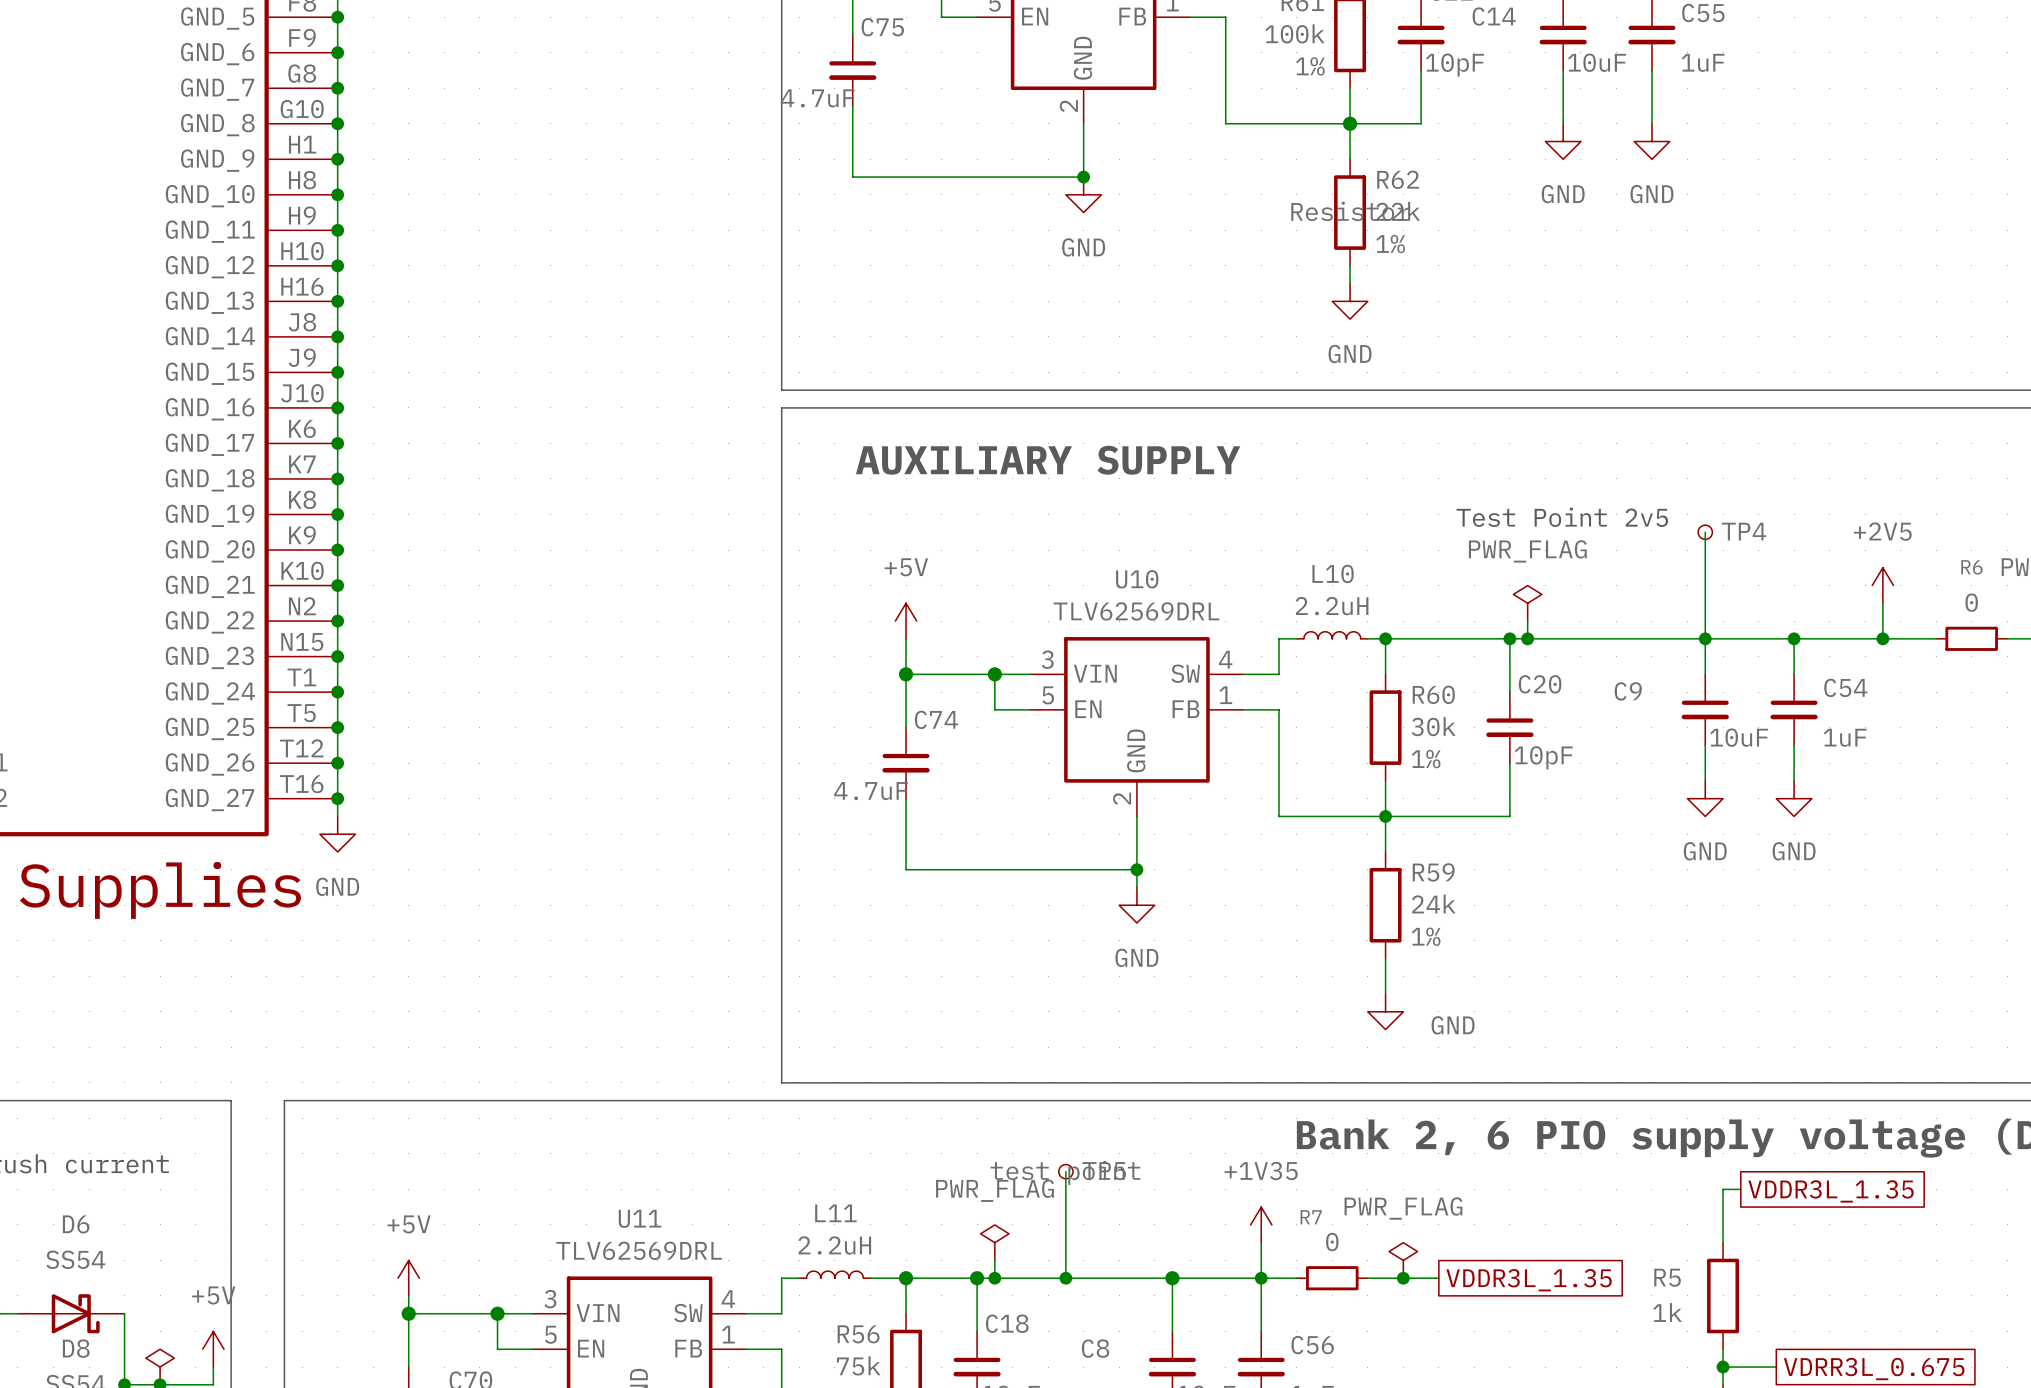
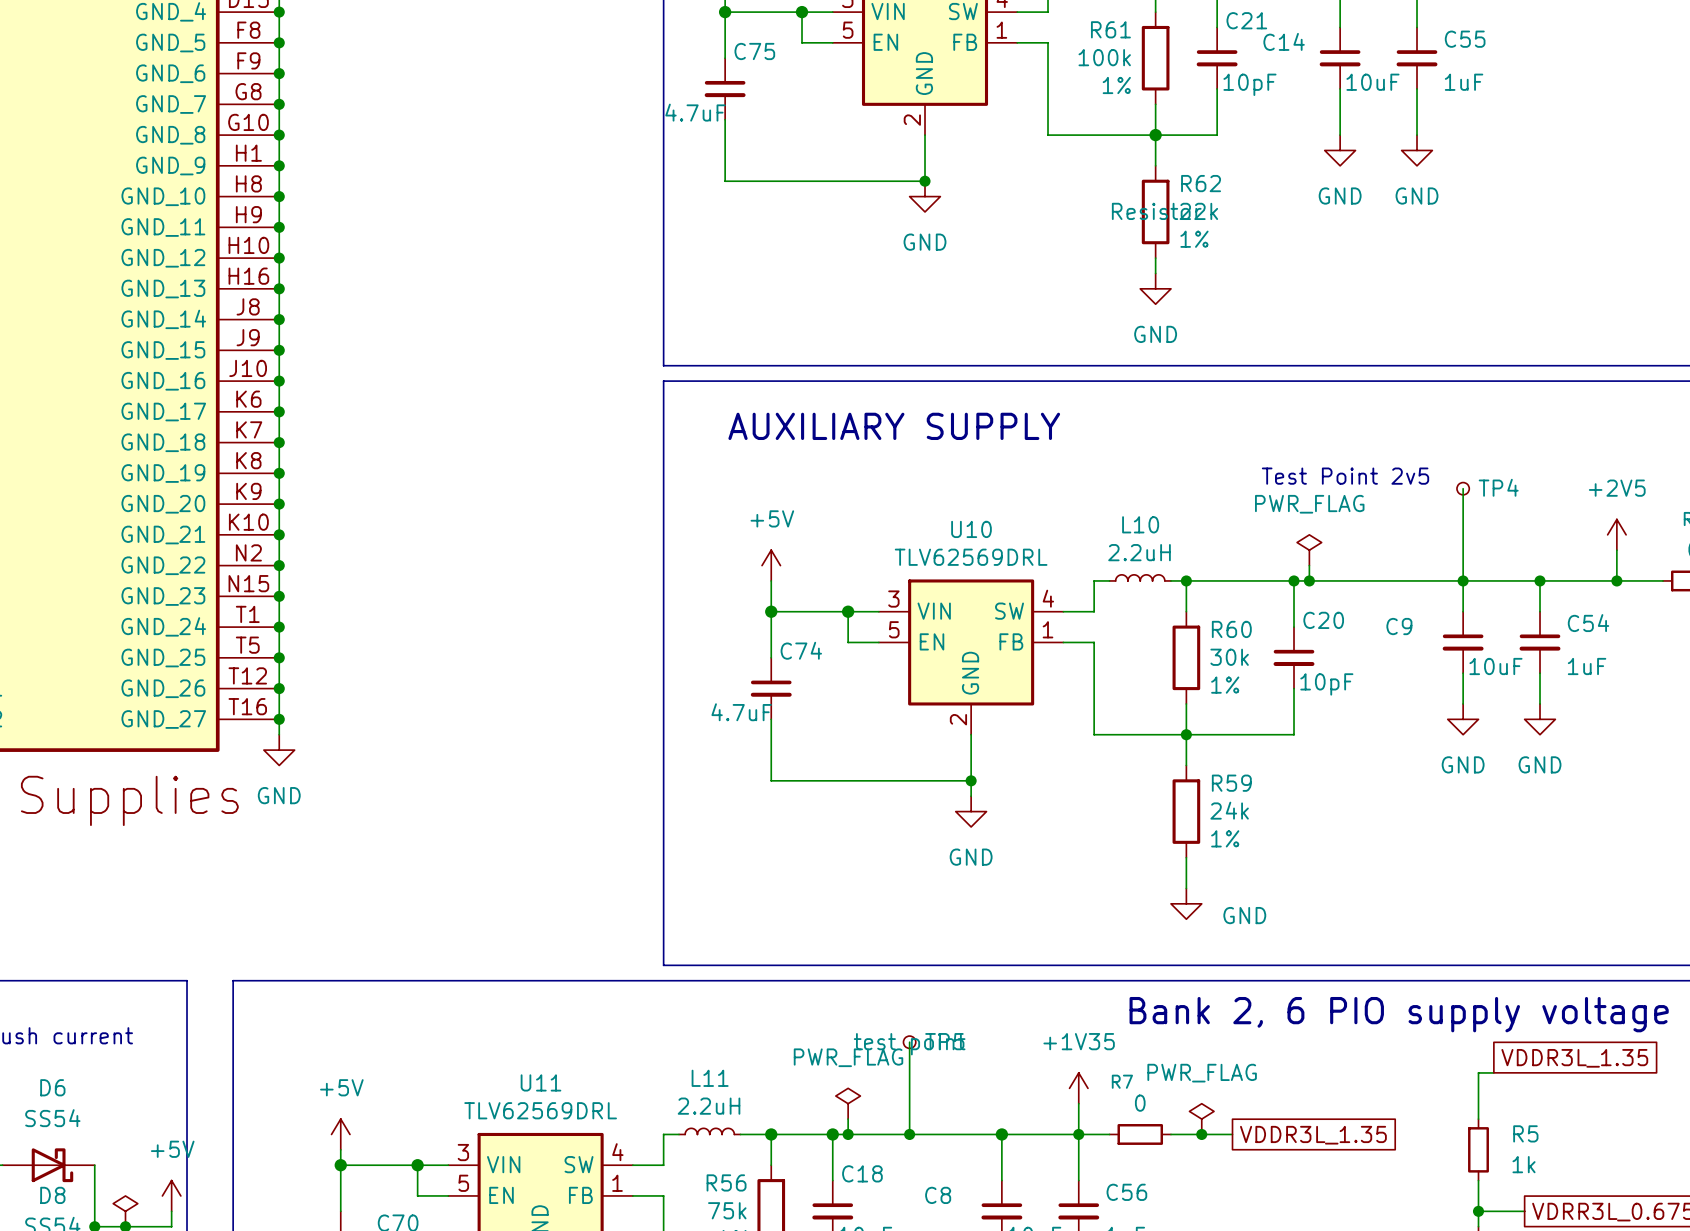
wire: (1740, 1189) (1723, 1189) (1723, 1207) -> (1493, 1072) (1478, 1072)
R5 symbol: [1707, 1242, 1740, 1350] -> [1468, 1119, 1489, 1181]
R5 name position: R5 (1667, 1277) -> R5 (1525, 1133)
R5 value position: 1k (1667, 1312) -> 1k (1524, 1164)

